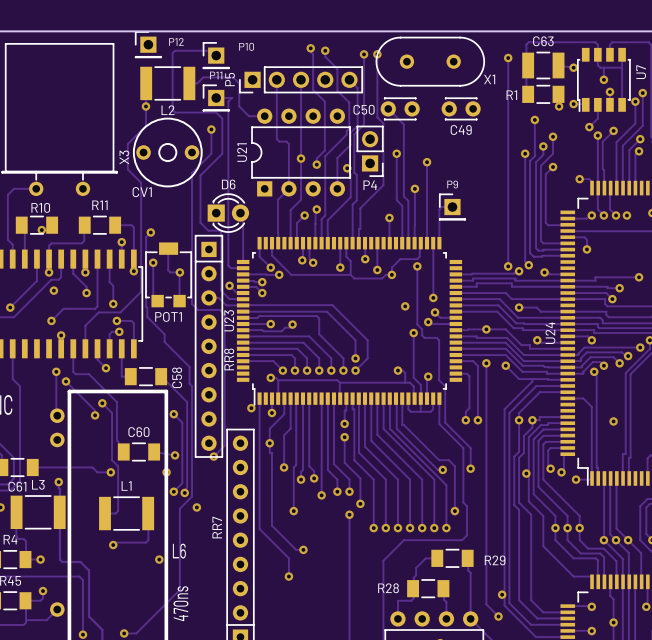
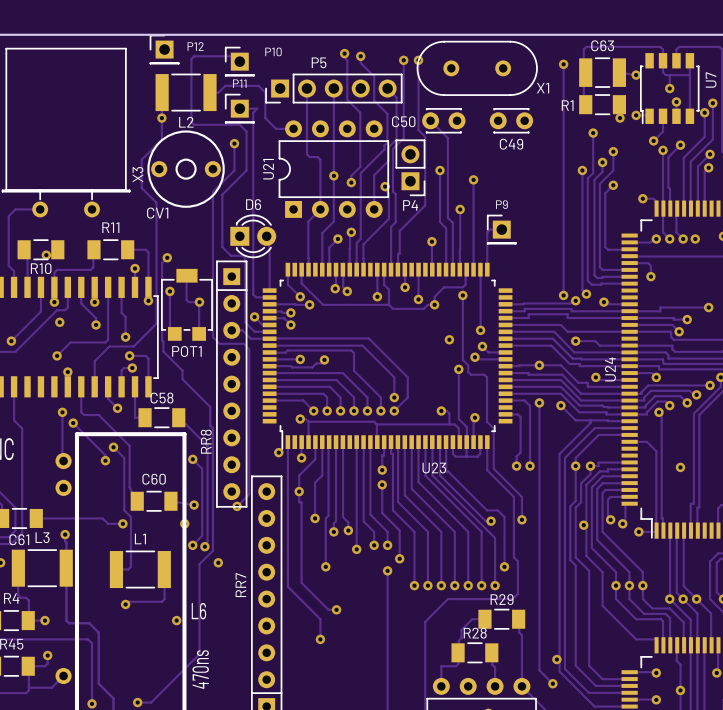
P5 name rotation: 0° (230, 79) -> 90° clockwise (319, 62)
P5 name position: P5 (230, 79) -> P5 (319, 62)
R10 name position: R10 (40, 207) -> R10 (41, 268)
U23 name rotation: 0° (229, 320) -> 90° clockwise (434, 467)
U23 name position: U23 (229, 320) -> U23 (434, 467)
RR8 name position: RR8 (229, 359) -> RR8 (206, 441)
C58 name rotation: 0° (177, 377) -> 90° clockwise (161, 398)
C58 name position: C58 (177, 377) -> C58 (161, 398)
R29 name position: R29 (495, 560) -> R29 (502, 599)
R28 name position: R28 (388, 588) -> R28 (475, 633)

